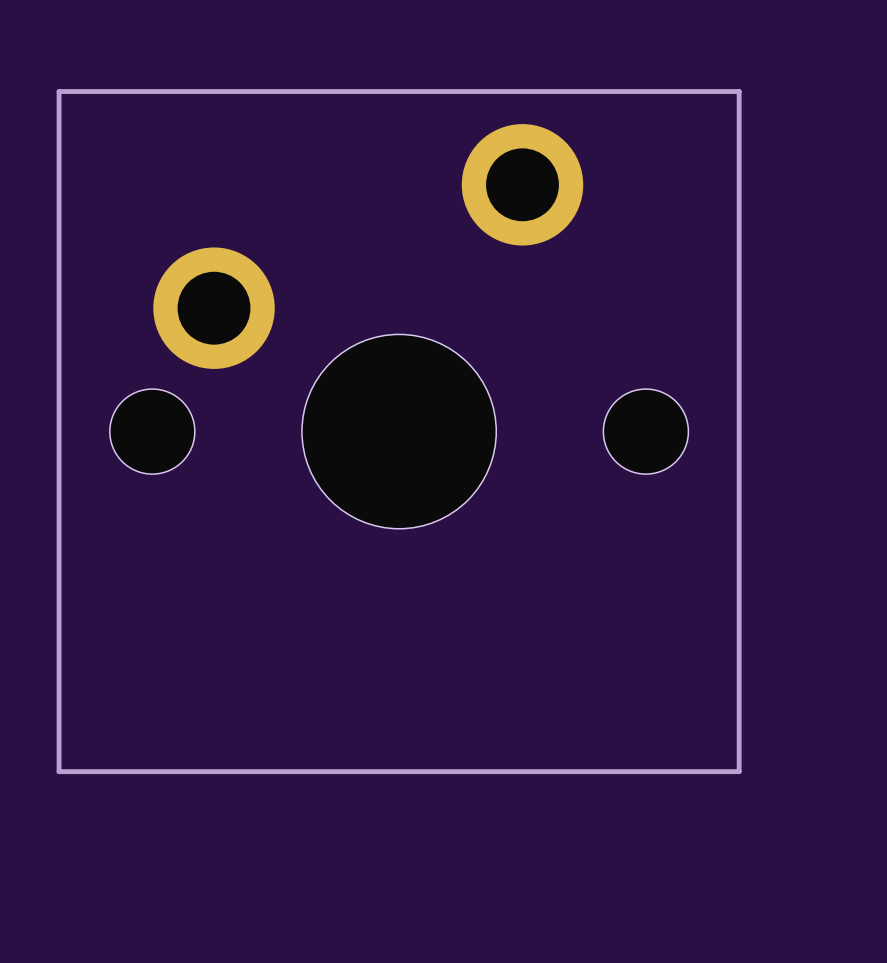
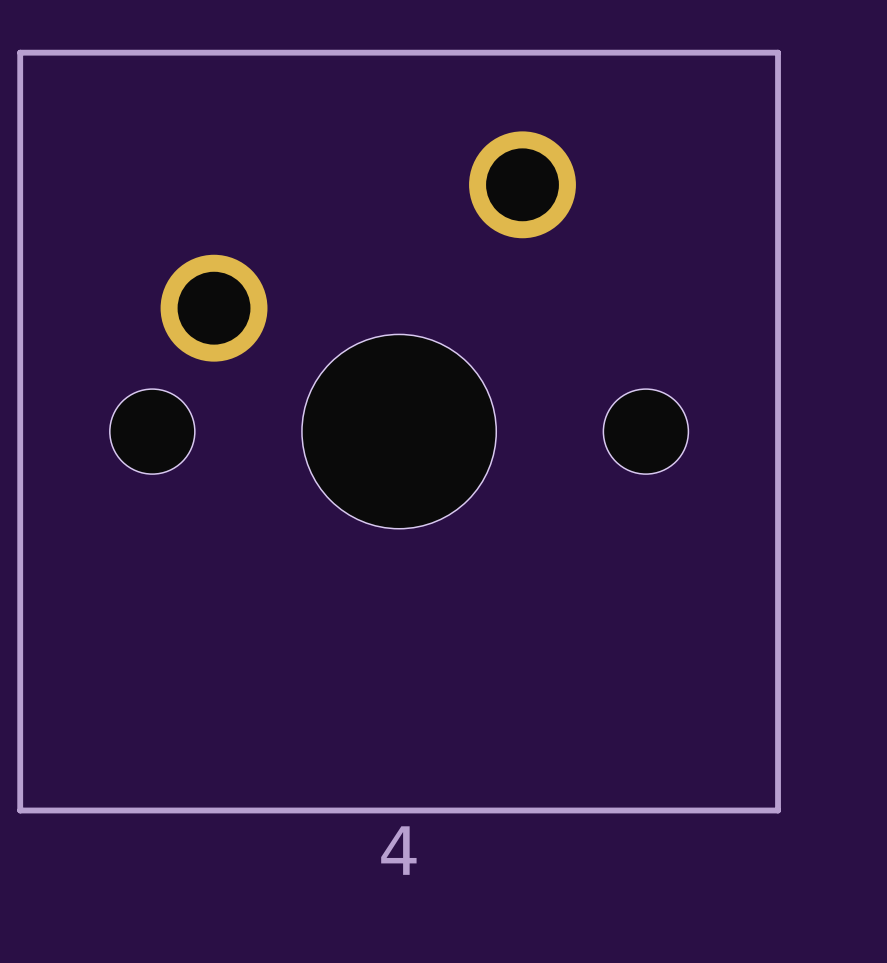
part footprint: [56, 89, 742, 775] -> [17, 49, 781, 814]
part value: none -> 4 (398, 850)

